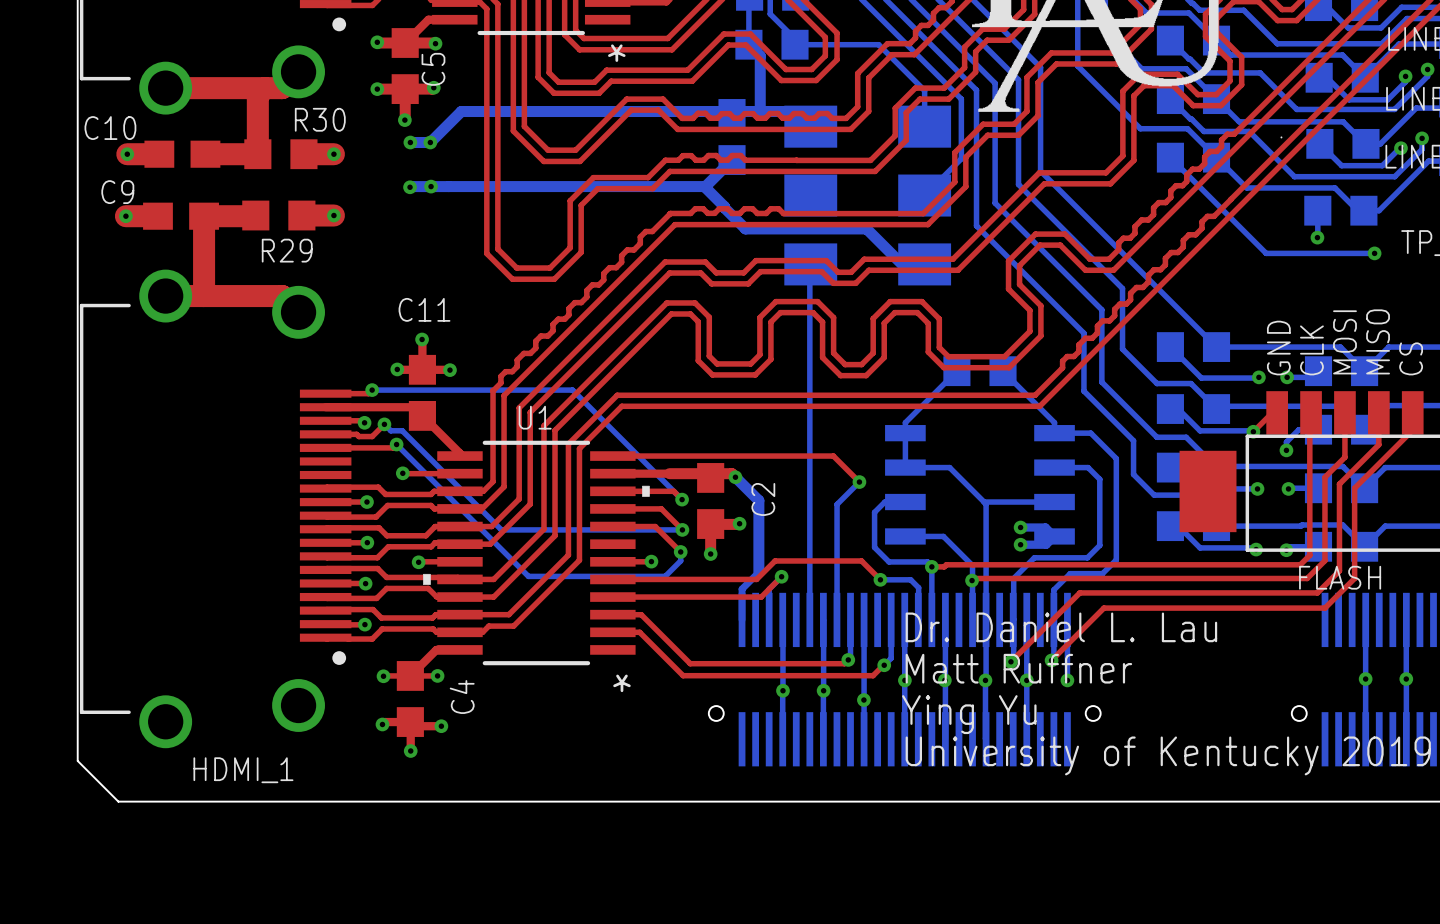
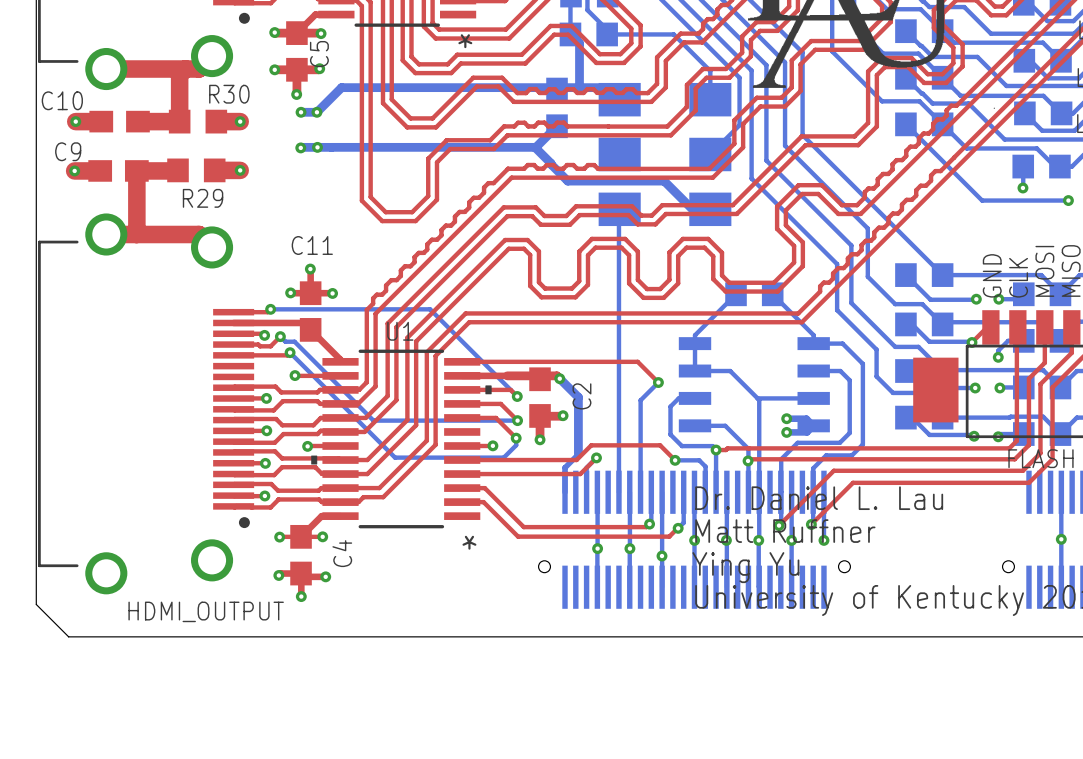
HDMI_1 name: HDMI_1 (243, 770) -> HDMI_OUTPUT (206, 611)

